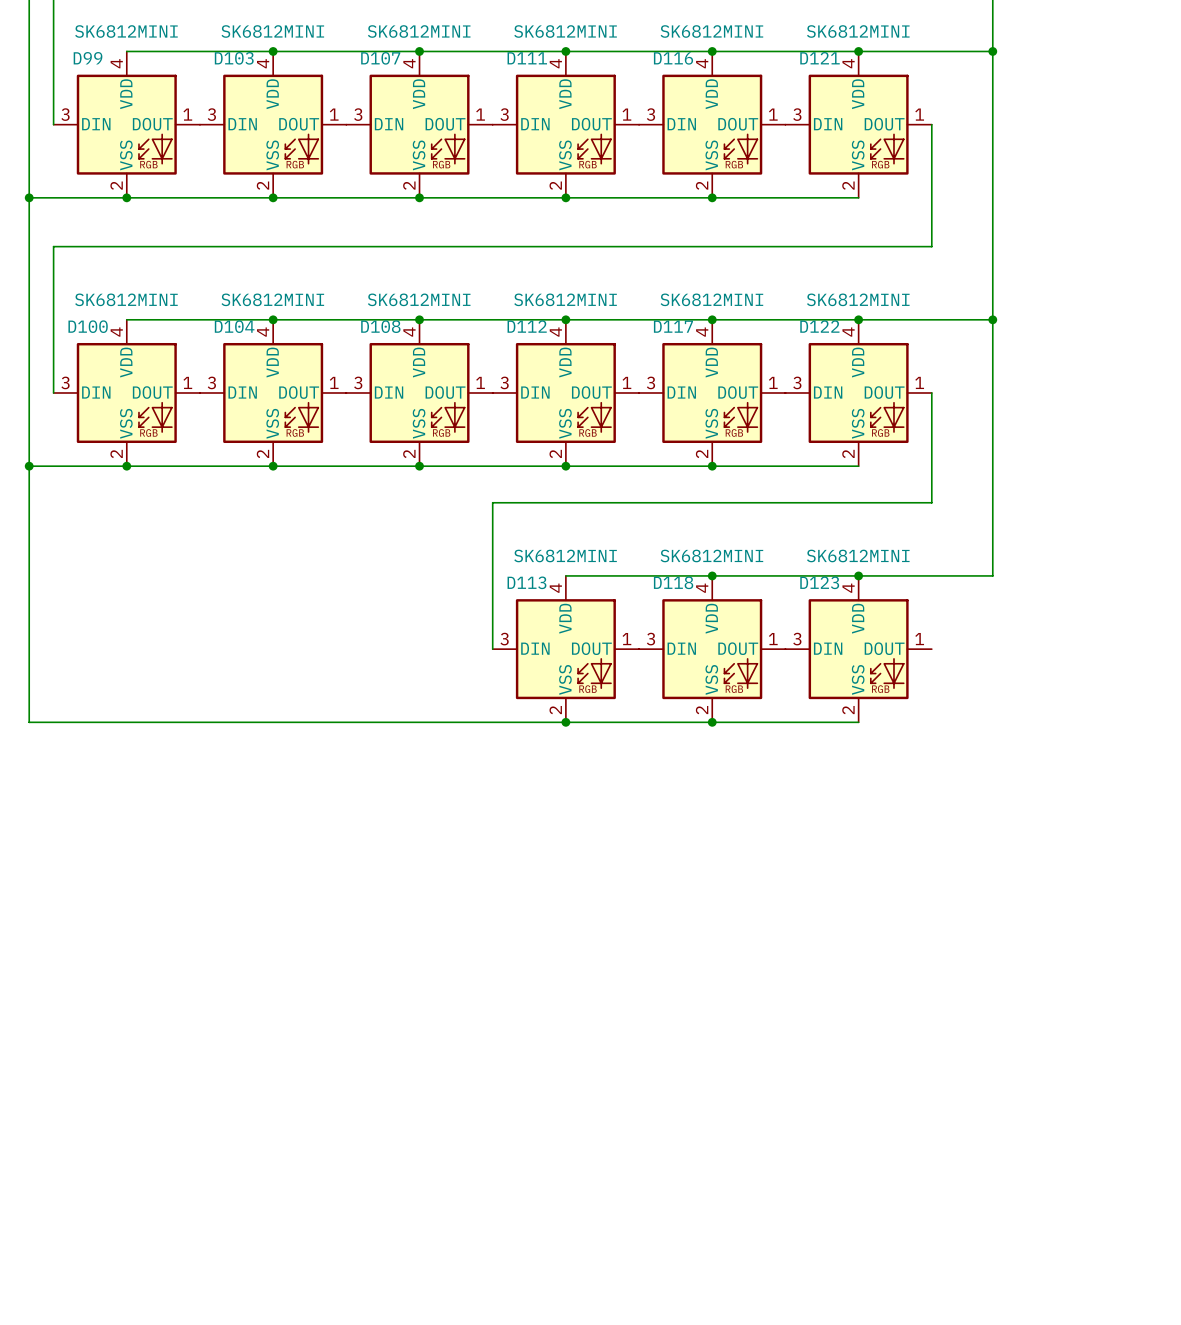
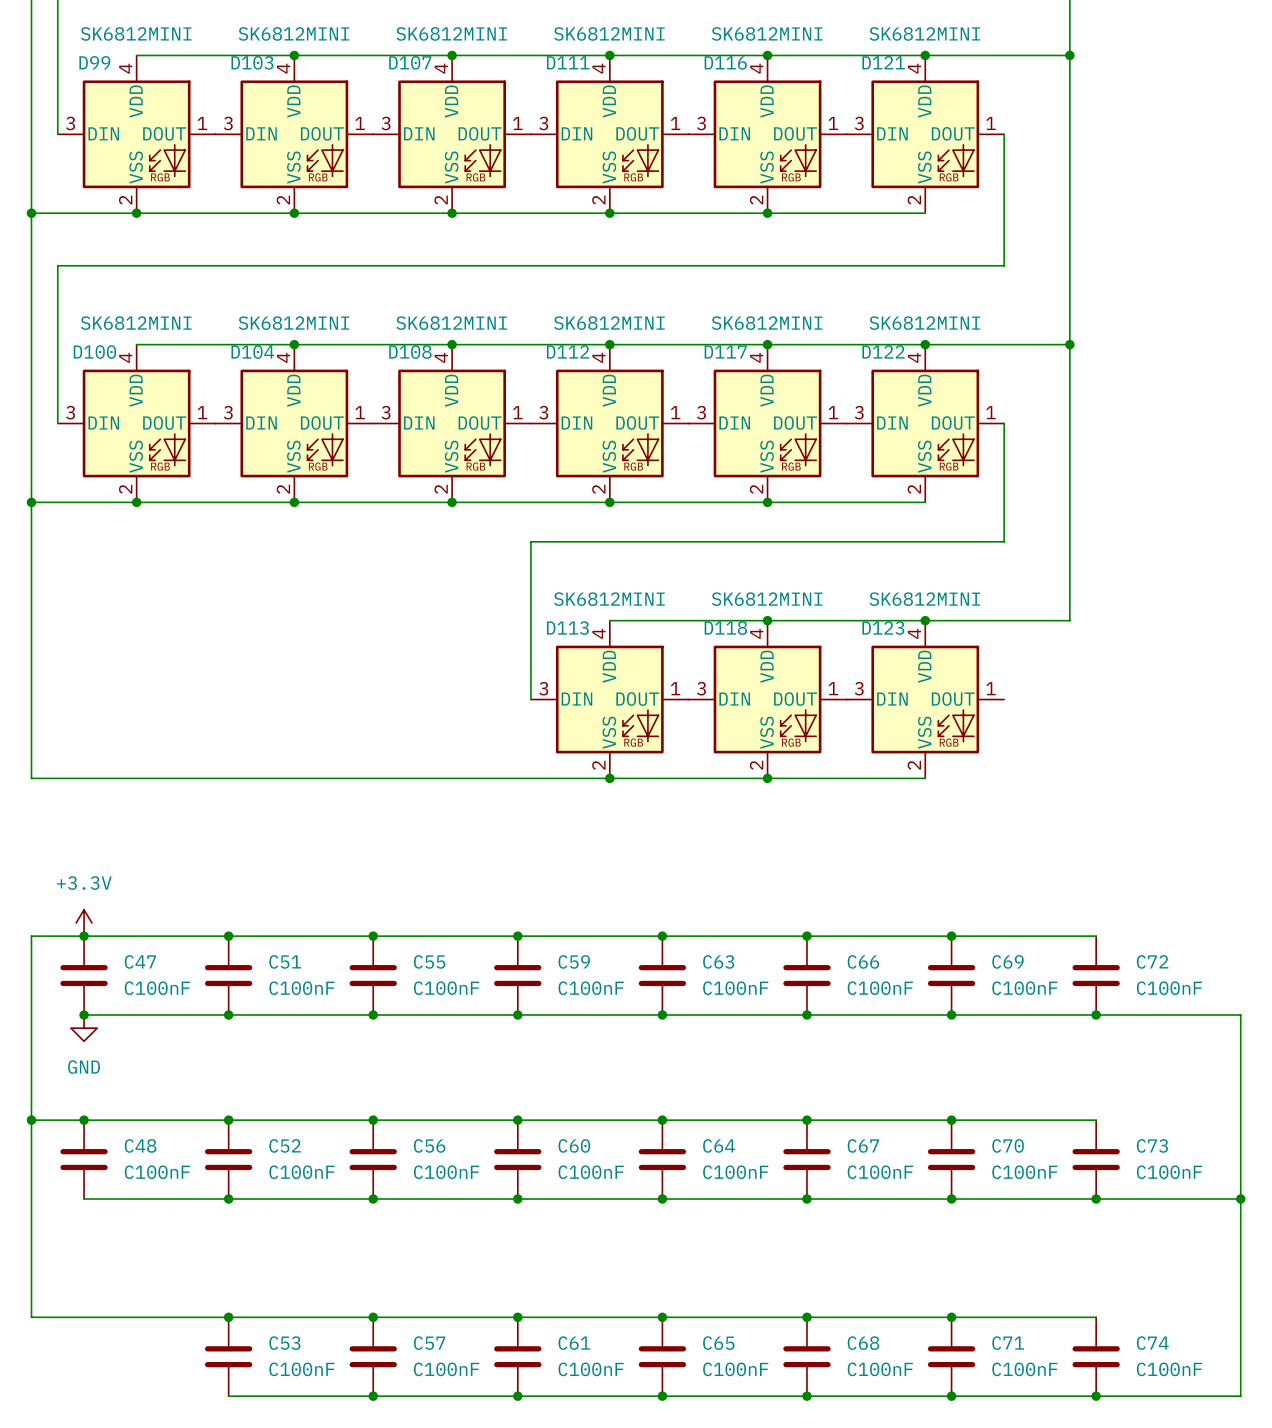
power symbol: none -> +3.3V (84, 922)
junction: none -> (84, 936)
junction: none -> (228, 936)
junction: none -> (373, 936)
junction: none -> (517, 936)
junction: none -> (662, 936)
junction: none -> (806, 936)
junction: none -> (951, 936)
wire: none -> (1096, 936) (31, 936) (31, 1317) (1096, 1317)
C47: none -> C100nF (84, 975)
C51: none -> C100nF (228, 975)
C55: none -> C100nF (373, 975)
C59: none -> C100nF (517, 975)
C63: none -> C100nF (662, 975)
C66: none -> C100nF (806, 975)
C69: none -> C100nF (951, 975)
C72: none -> C100nF (1096, 975)
wire: none -> (84, 1014) (1240, 1014) (1240, 1396) (228, 1396)
junction: none -> (84, 1014)
junction: none -> (228, 1014)
junction: none -> (373, 1014)
junction: none -> (517, 1014)
junction: none -> (662, 1014)
junction: none -> (806, 1014)
junction: none -> (951, 1014)
junction: none -> (1096, 1014)
power symbol: none -> GND (84, 1028)
wire: none -> (31, 1120) (1096, 1120)
junction: none -> (31, 1120)
junction: none -> (84, 1120)
junction: none -> (228, 1120)
junction: none -> (373, 1120)
junction: none -> (517, 1120)
junction: none -> (662, 1120)
junction: none -> (806, 1120)
junction: none -> (951, 1120)
C48: none -> C100nF (84, 1159)
C52: none -> C100nF (228, 1159)
C56: none -> C100nF (373, 1159)
C60: none -> C100nF (517, 1159)
C64: none -> C100nF (662, 1159)
C67: none -> C100nF (806, 1159)
C70: none -> C100nF (951, 1159)
C73: none -> C100nF (1096, 1159)
wire: none -> (84, 1199) (1240, 1199)
junction: none -> (228, 1199)
junction: none -> (373, 1199)
junction: none -> (517, 1199)
junction: none -> (662, 1199)
junction: none -> (806, 1199)
junction: none -> (951, 1199)
junction: none -> (1096, 1199)
junction: none -> (1240, 1199)
junction: none -> (228, 1317)
junction: none -> (373, 1317)
junction: none -> (517, 1317)
junction: none -> (662, 1317)
junction: none -> (806, 1317)
junction: none -> (951, 1317)
C53: none -> C100nF (228, 1356)
C57: none -> C100nF (373, 1356)
C61: none -> C100nF (517, 1356)
C65: none -> C100nF (662, 1356)
C68: none -> C100nF (806, 1356)
C71: none -> C100nF (951, 1356)
C74: none -> C100nF (1096, 1356)
junction: none -> (373, 1396)
junction: none -> (517, 1396)
junction: none -> (662, 1396)
junction: none -> (806, 1396)
junction: none -> (951, 1396)
junction: none -> (1096, 1396)

